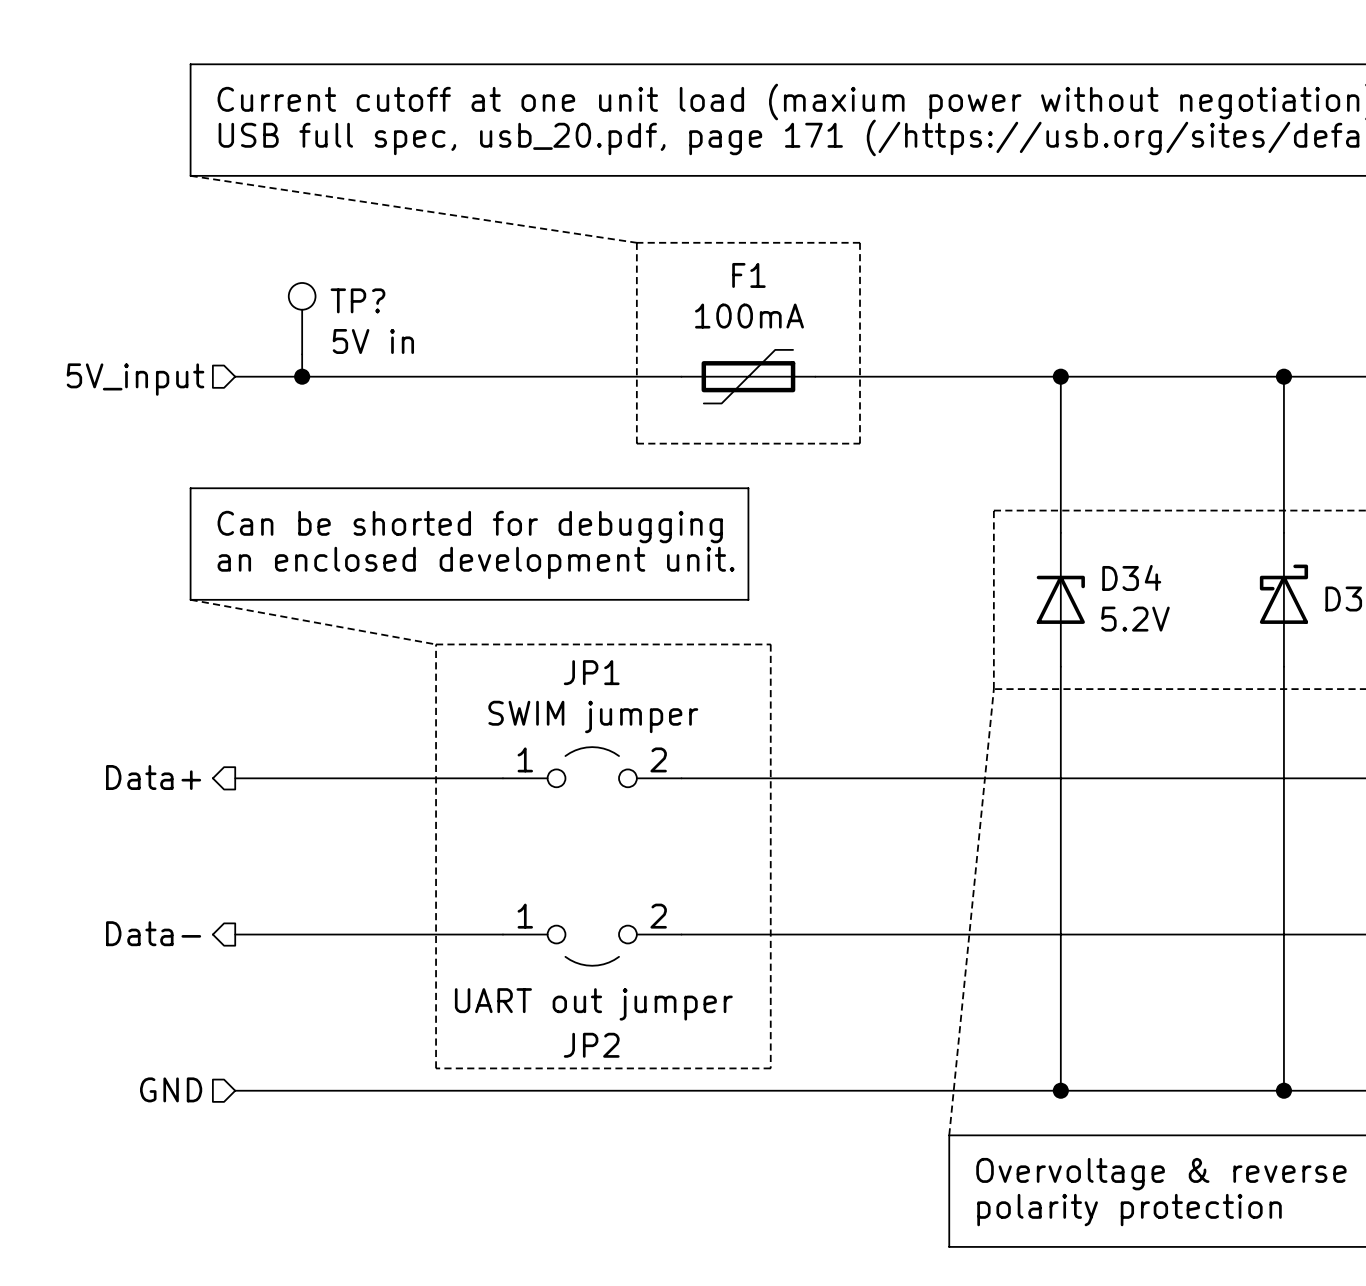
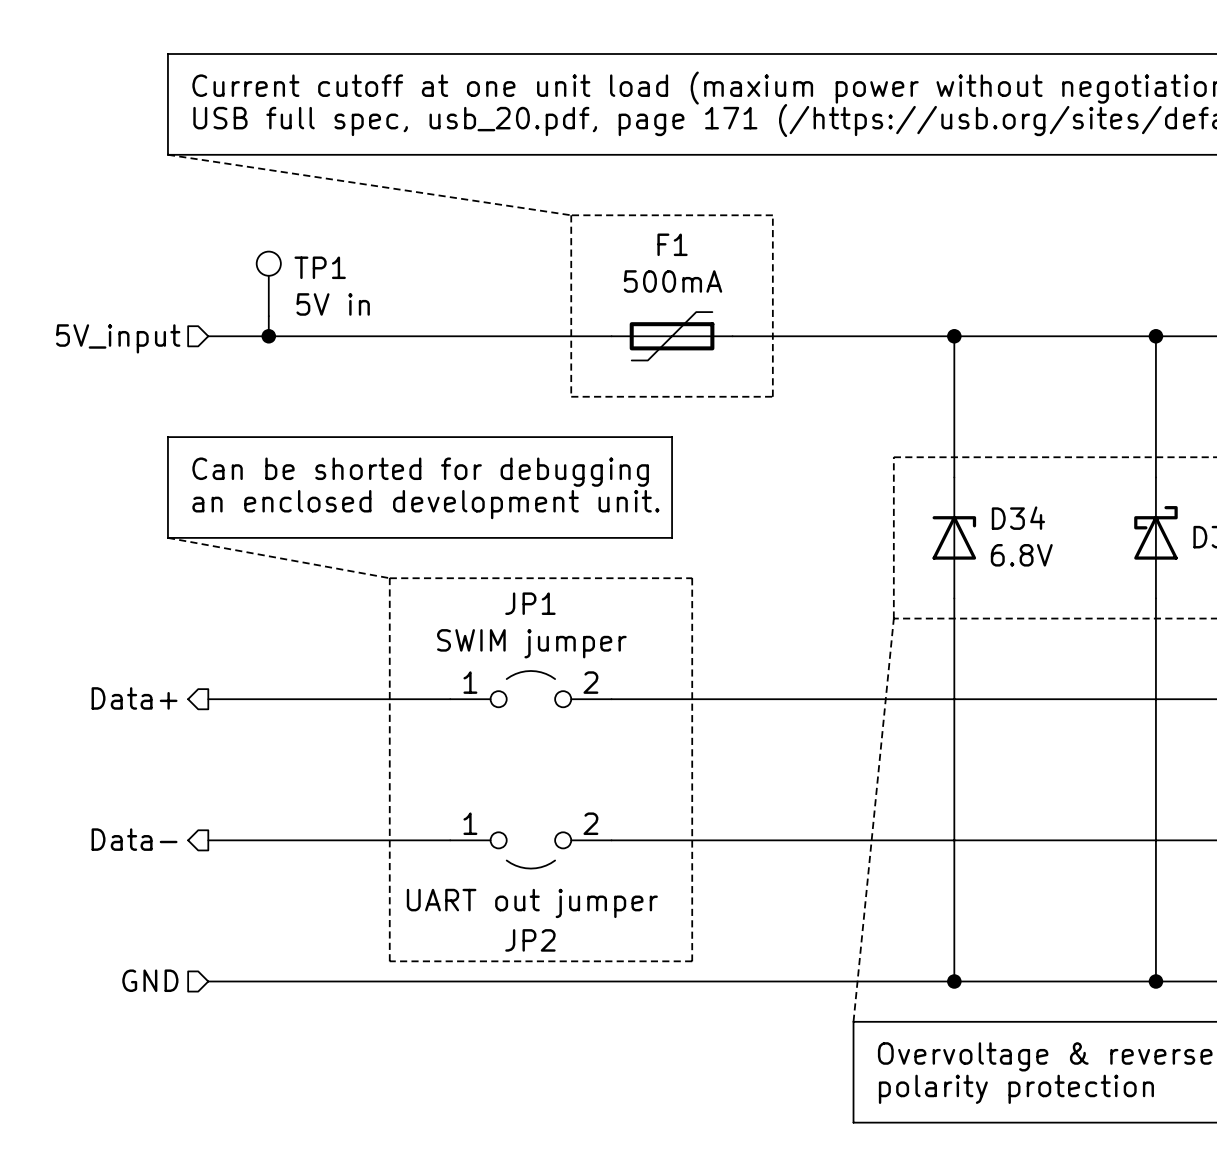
TP? name: TP? (357, 300) -> TP1 (320, 267)
F1 value: 100mA (749, 316) -> 500mA (673, 281)
D34 value: 5.2V (1135, 619) -> 6.8V (1021, 555)

